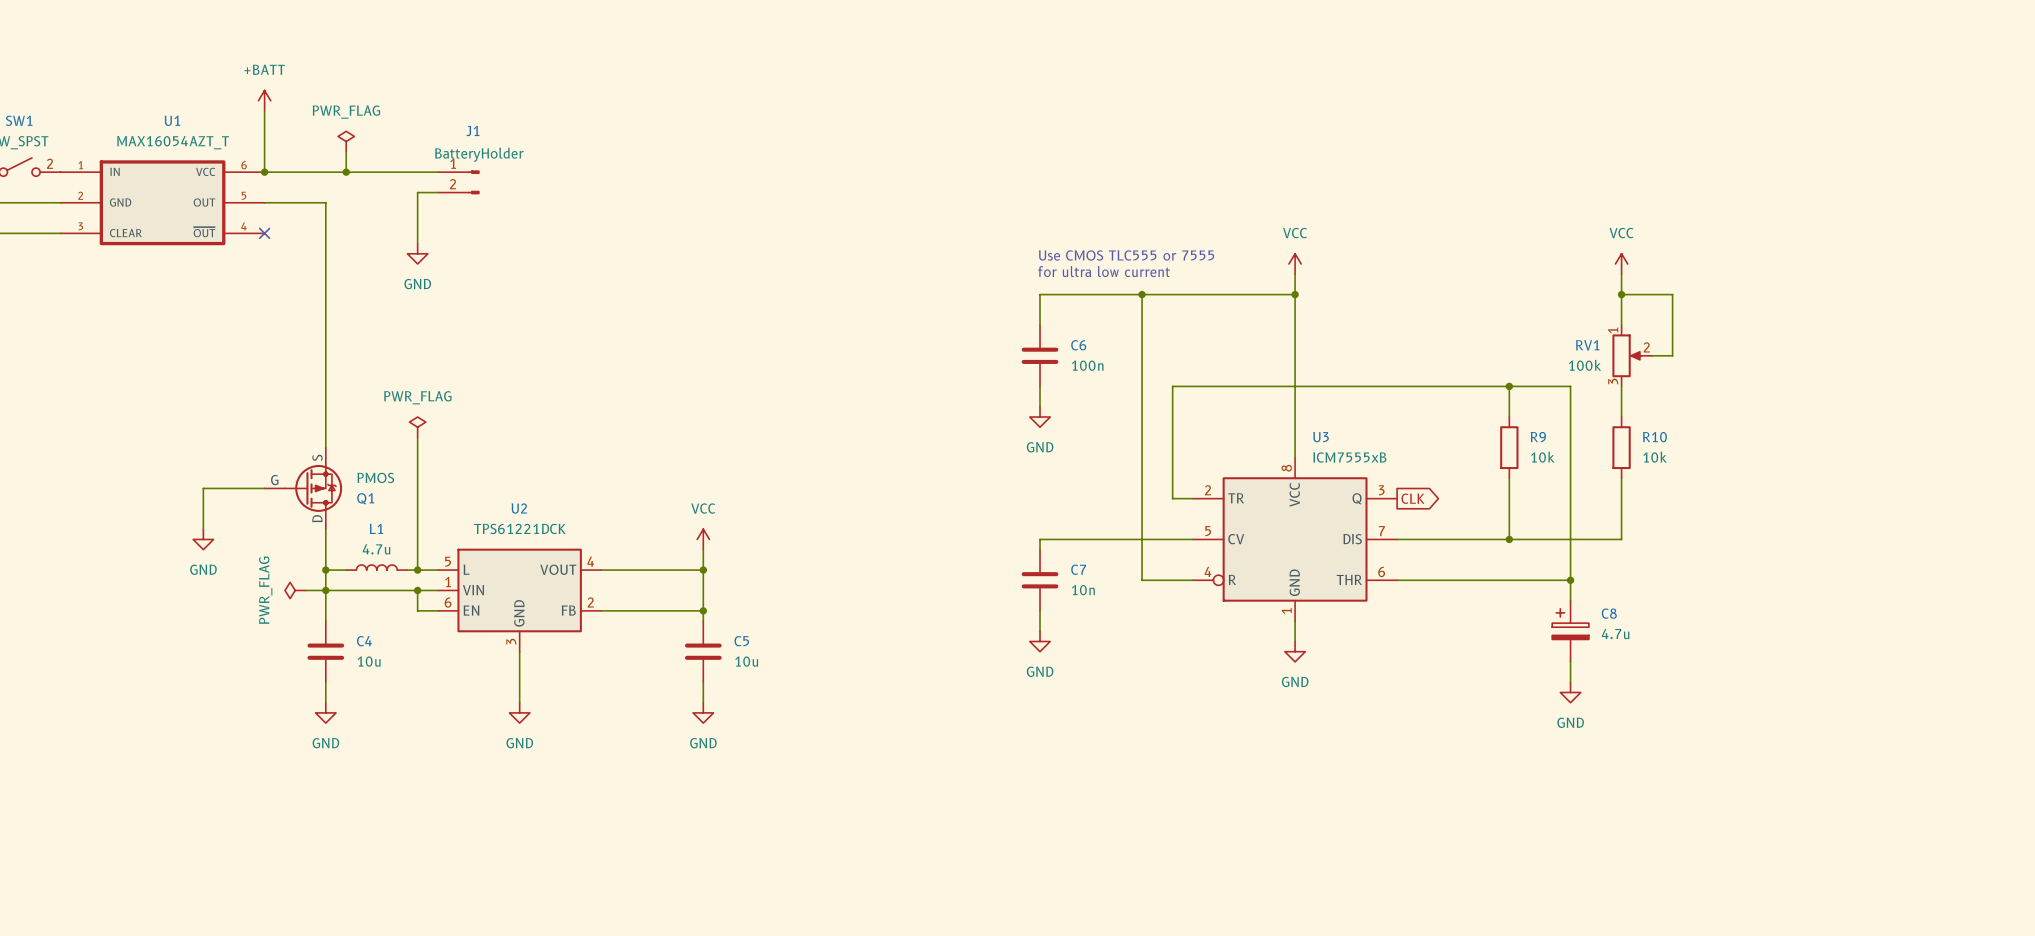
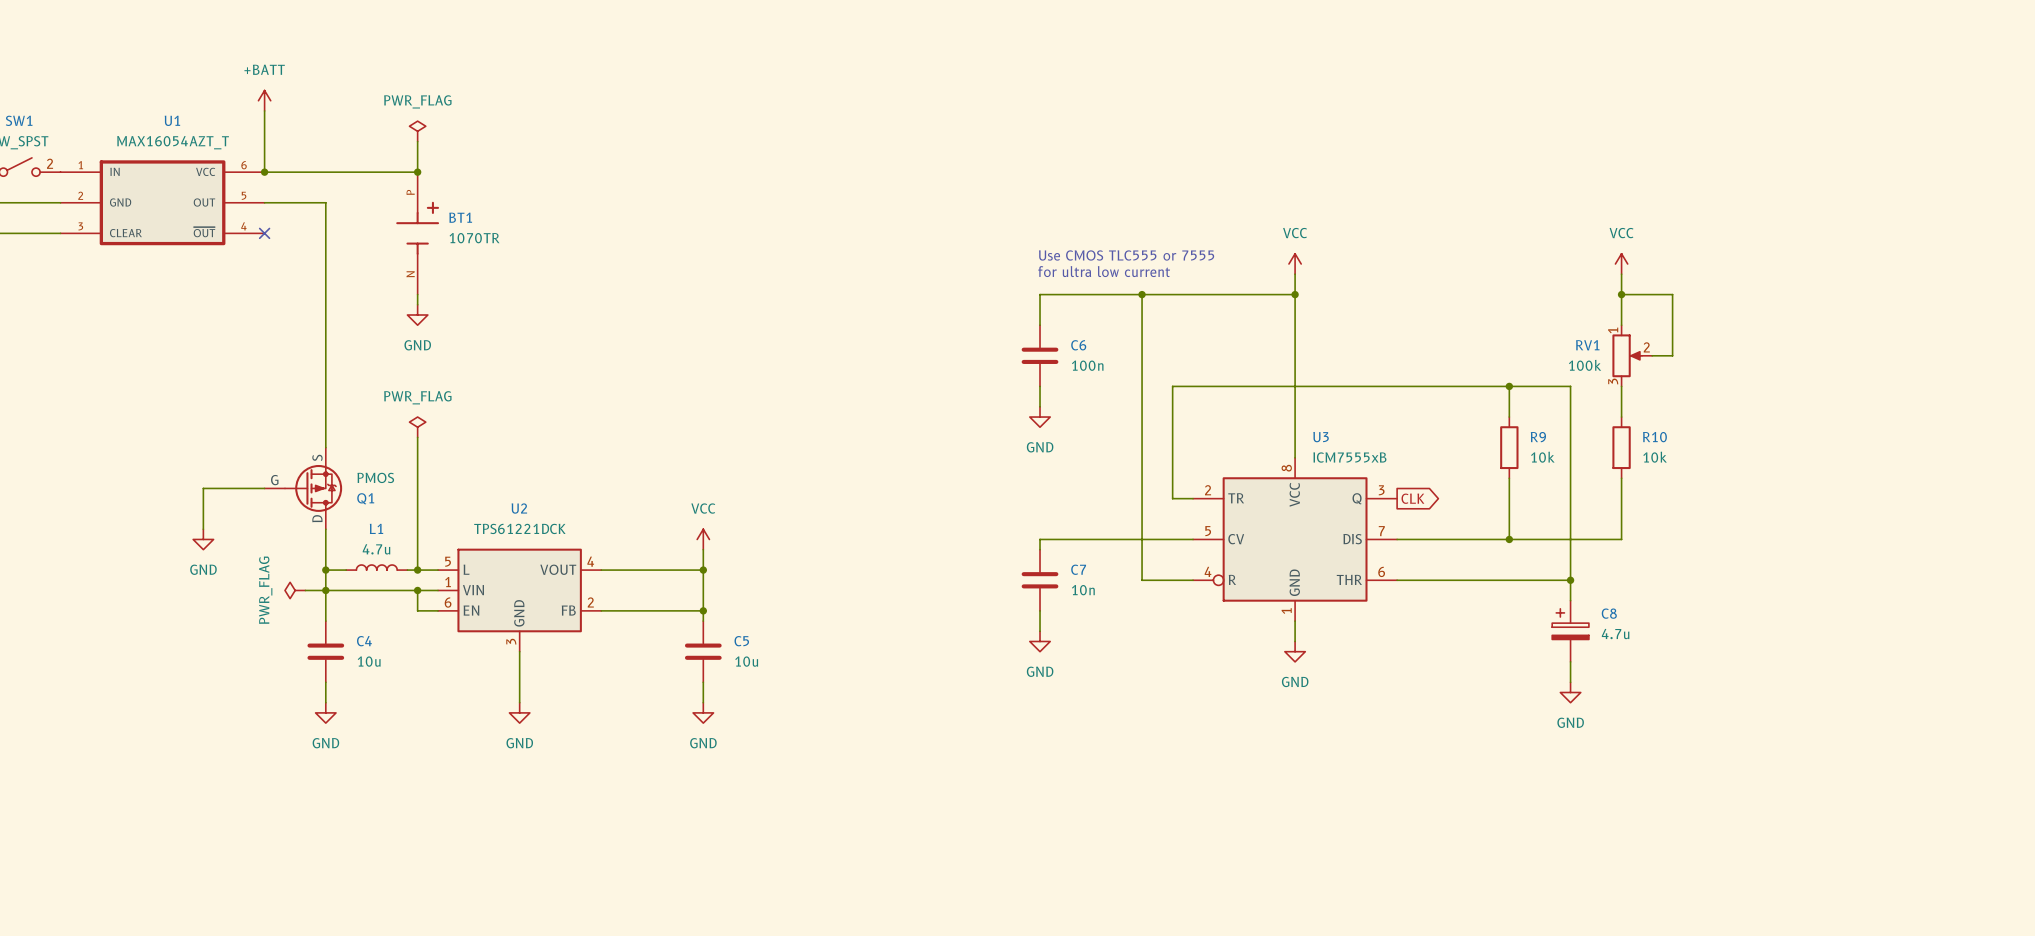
power symbol position: PWR_FLAG (346, 141) -> PWR_FLAG (417, 131)
wire: (346, 151) (346, 172) -> none
junction: (346, 172) -> none
wire: (417, 172) (438, 172) -> (417, 172) (417, 141)
junction: none -> (417, 172)
J1: BatteryHolder (458, 182) -> none
wire: (438, 192) (417, 192) (417, 243) -> none
BT1: none -> 1070TR (417, 233)
power symbol position: GND (417, 253) -> GND (417, 315)
wire: none -> (417, 294) (417, 304)

